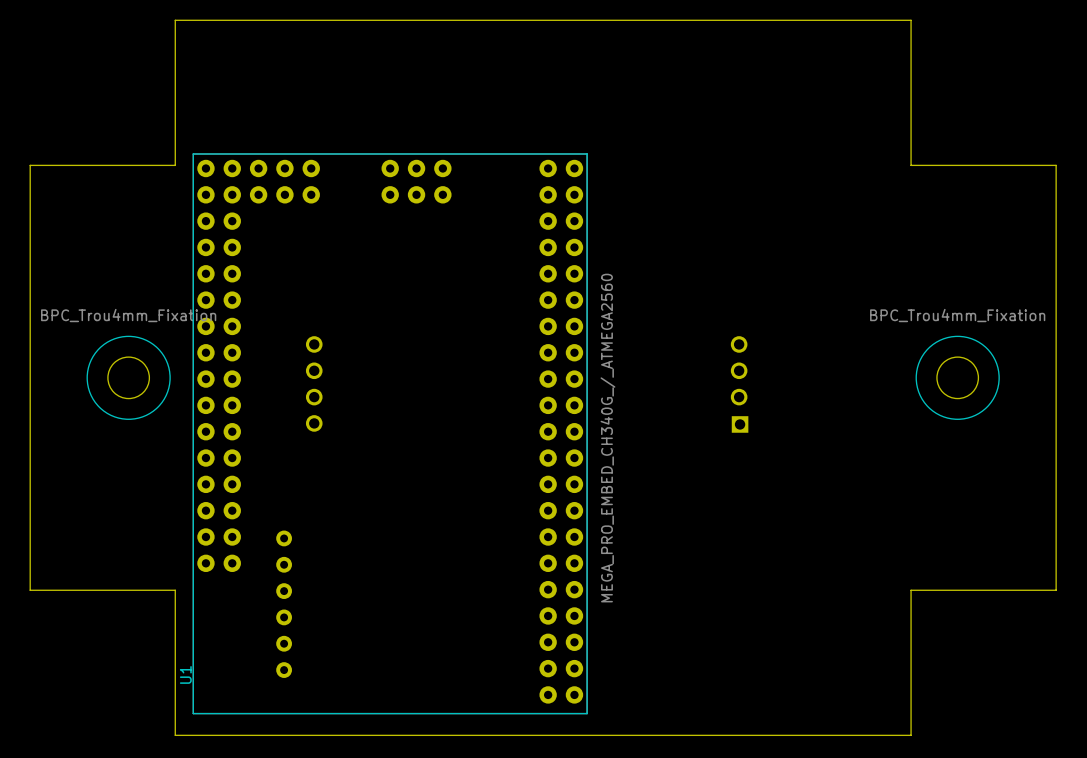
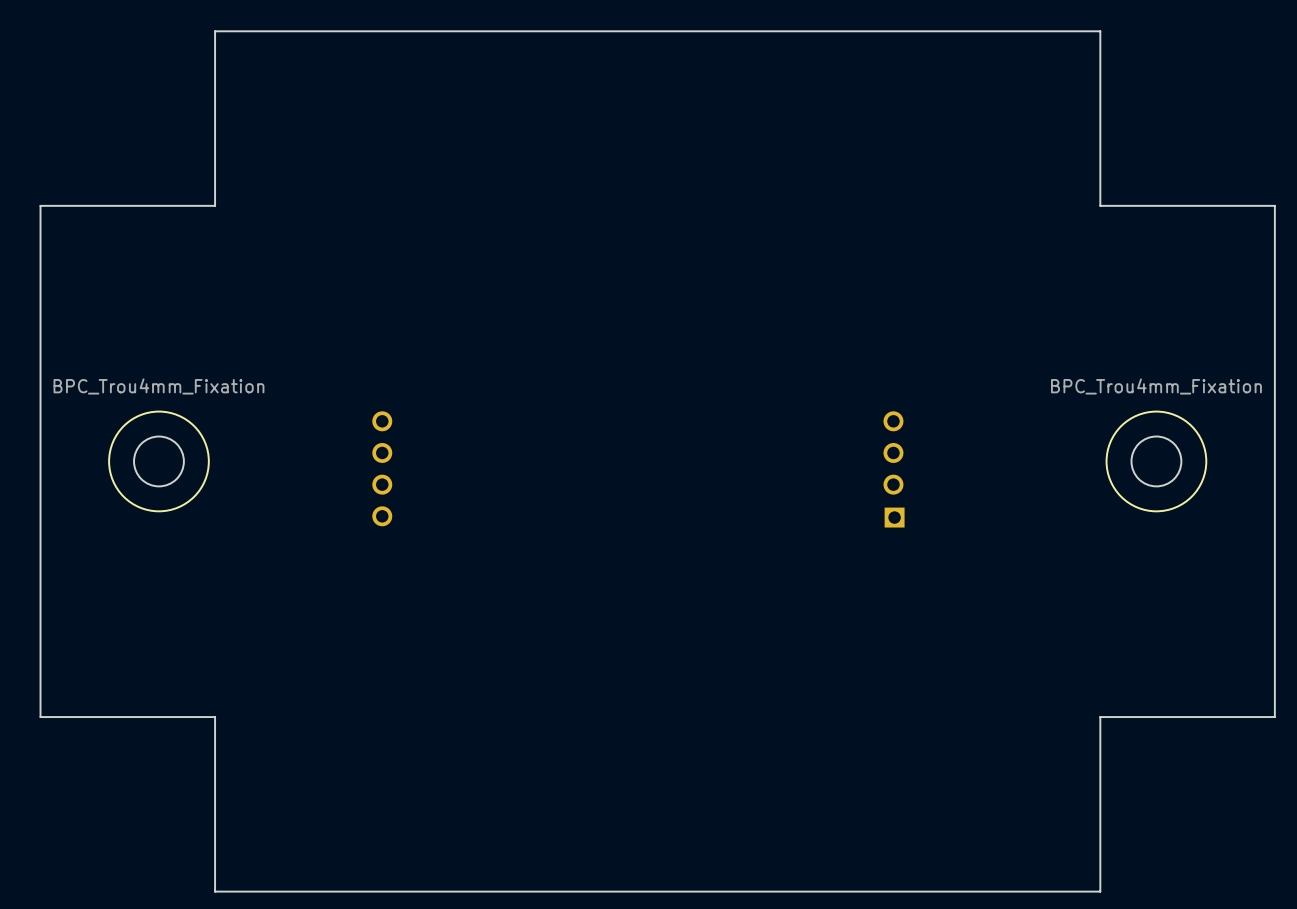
U1: MEGA_PRO_EMBED_CH340G_/_ATMEGA2560 (390, 433) -> none
part: (284, 604) -> none

